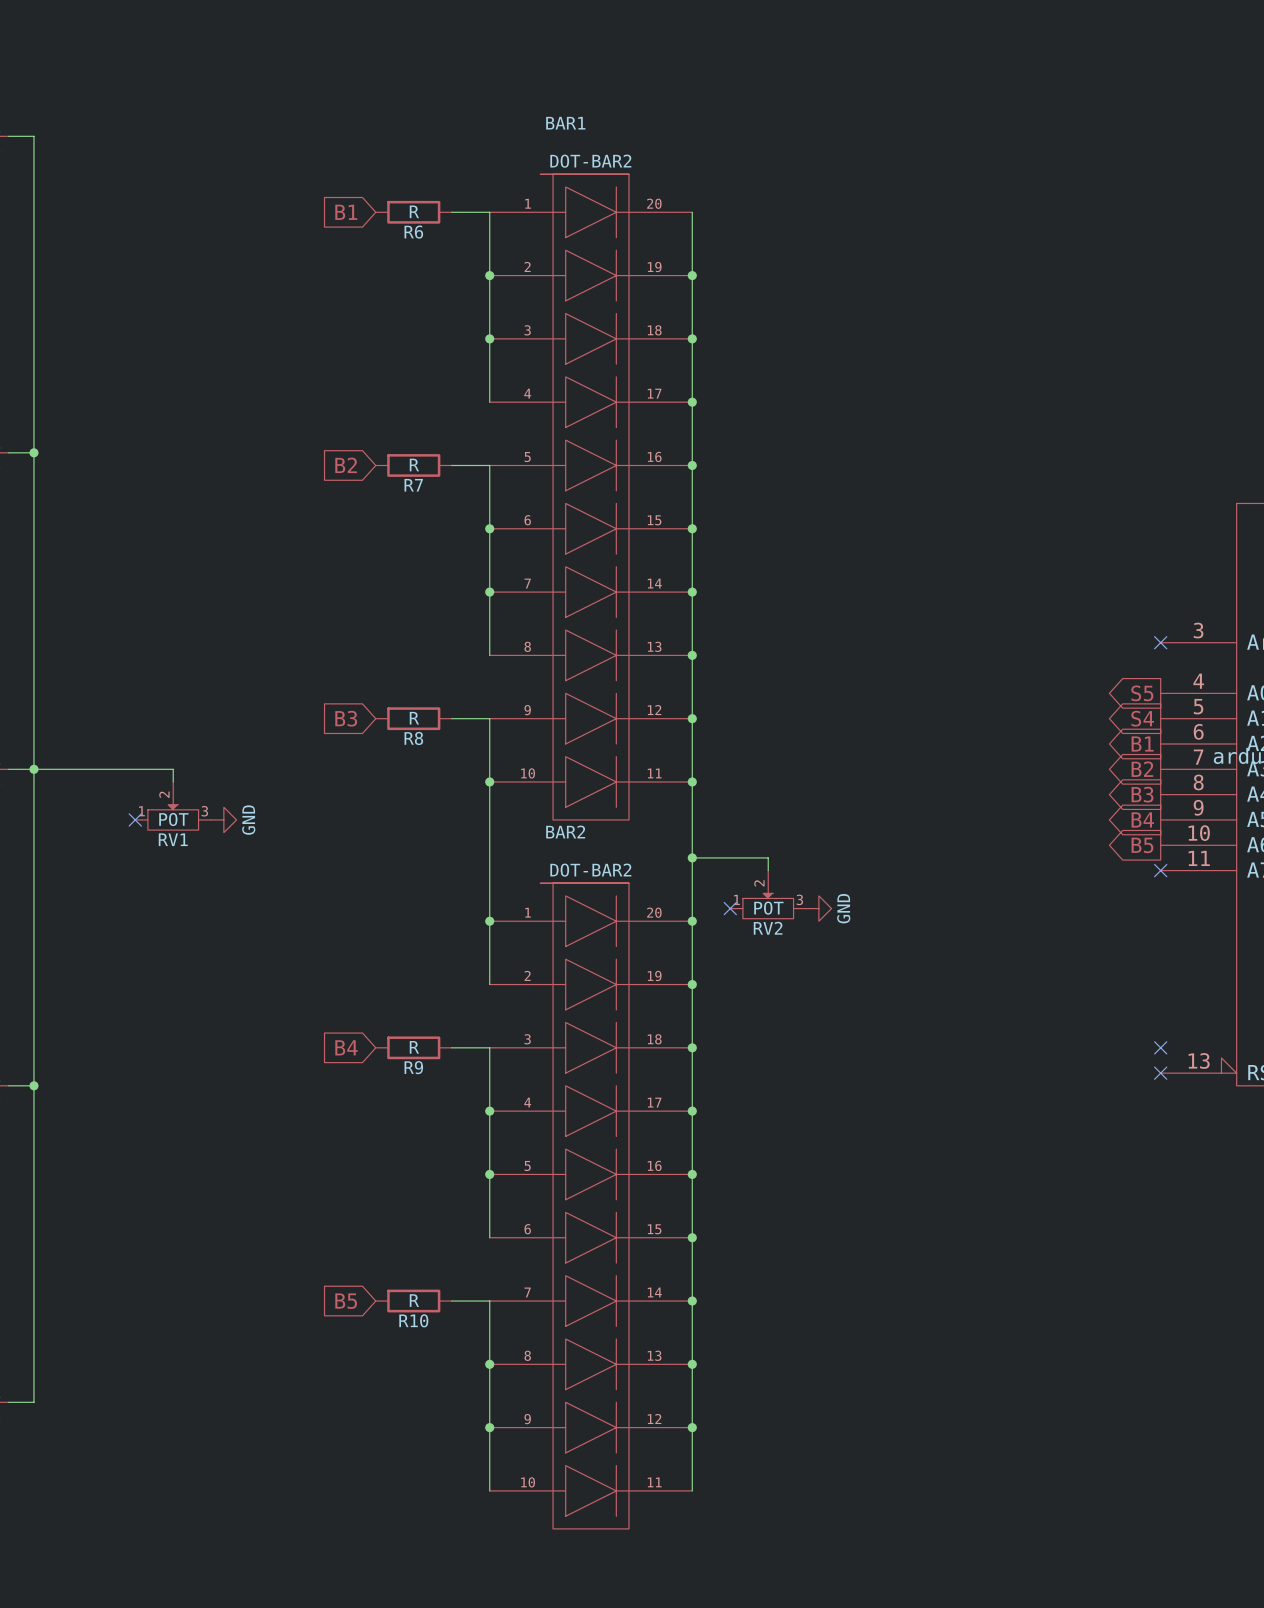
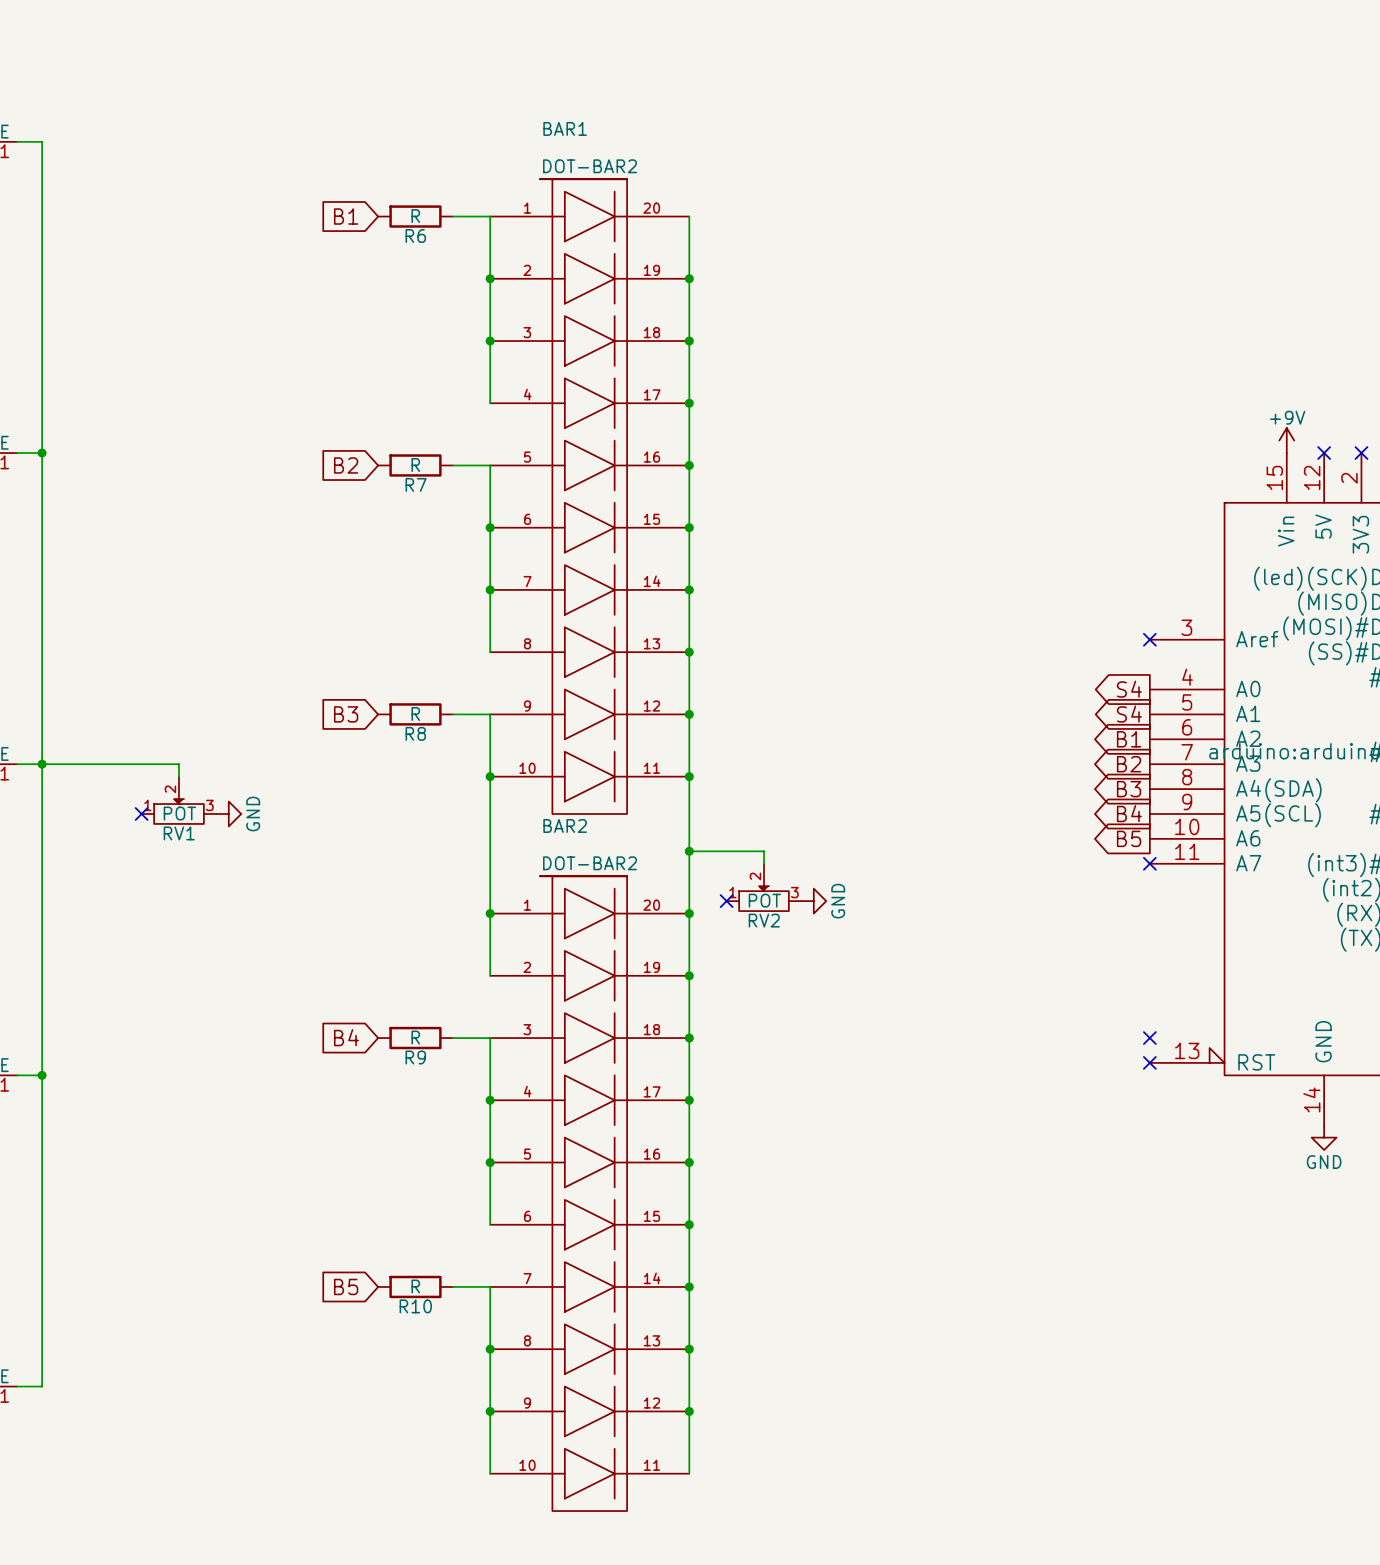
global label: S5 (1142, 693) -> S4 (1129, 689)

